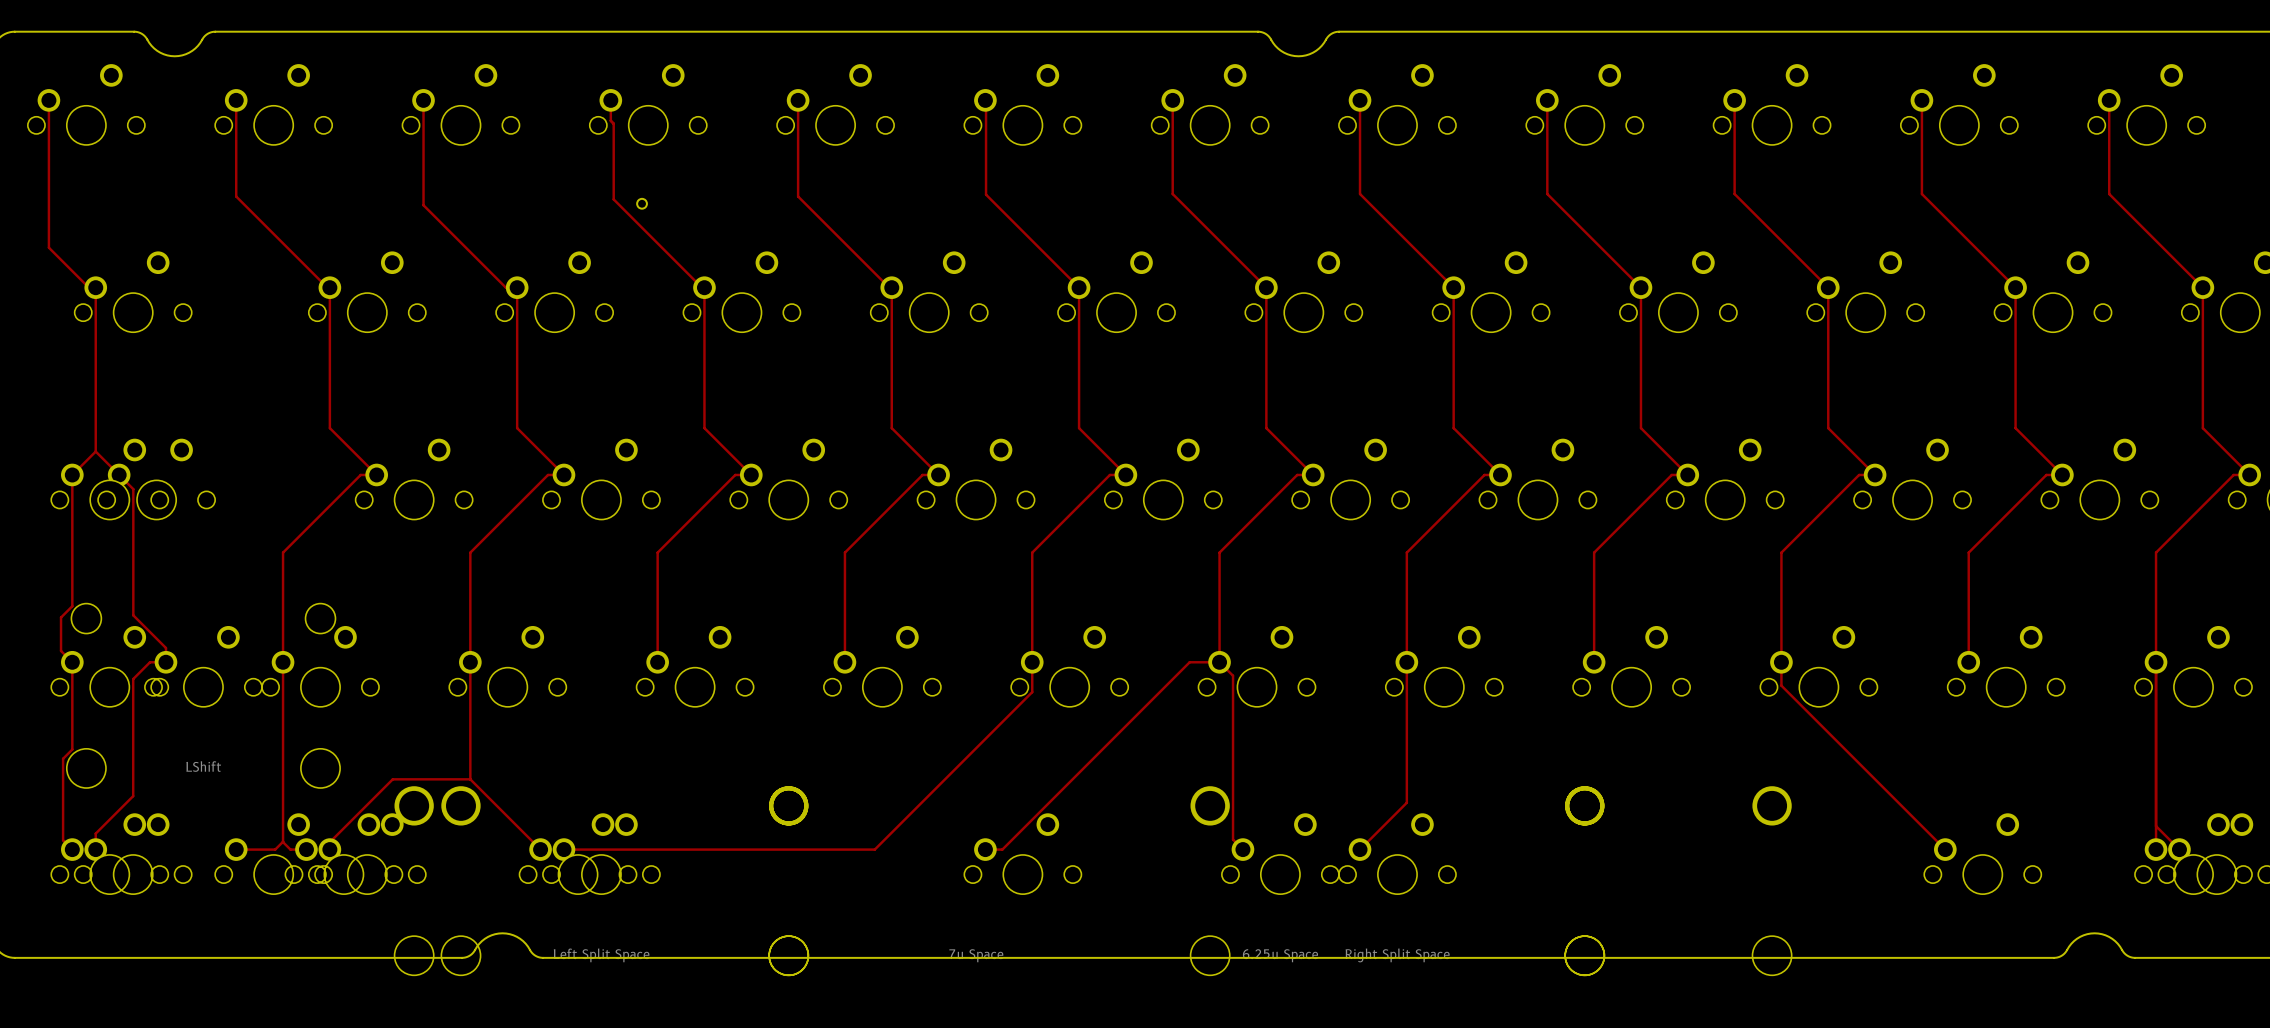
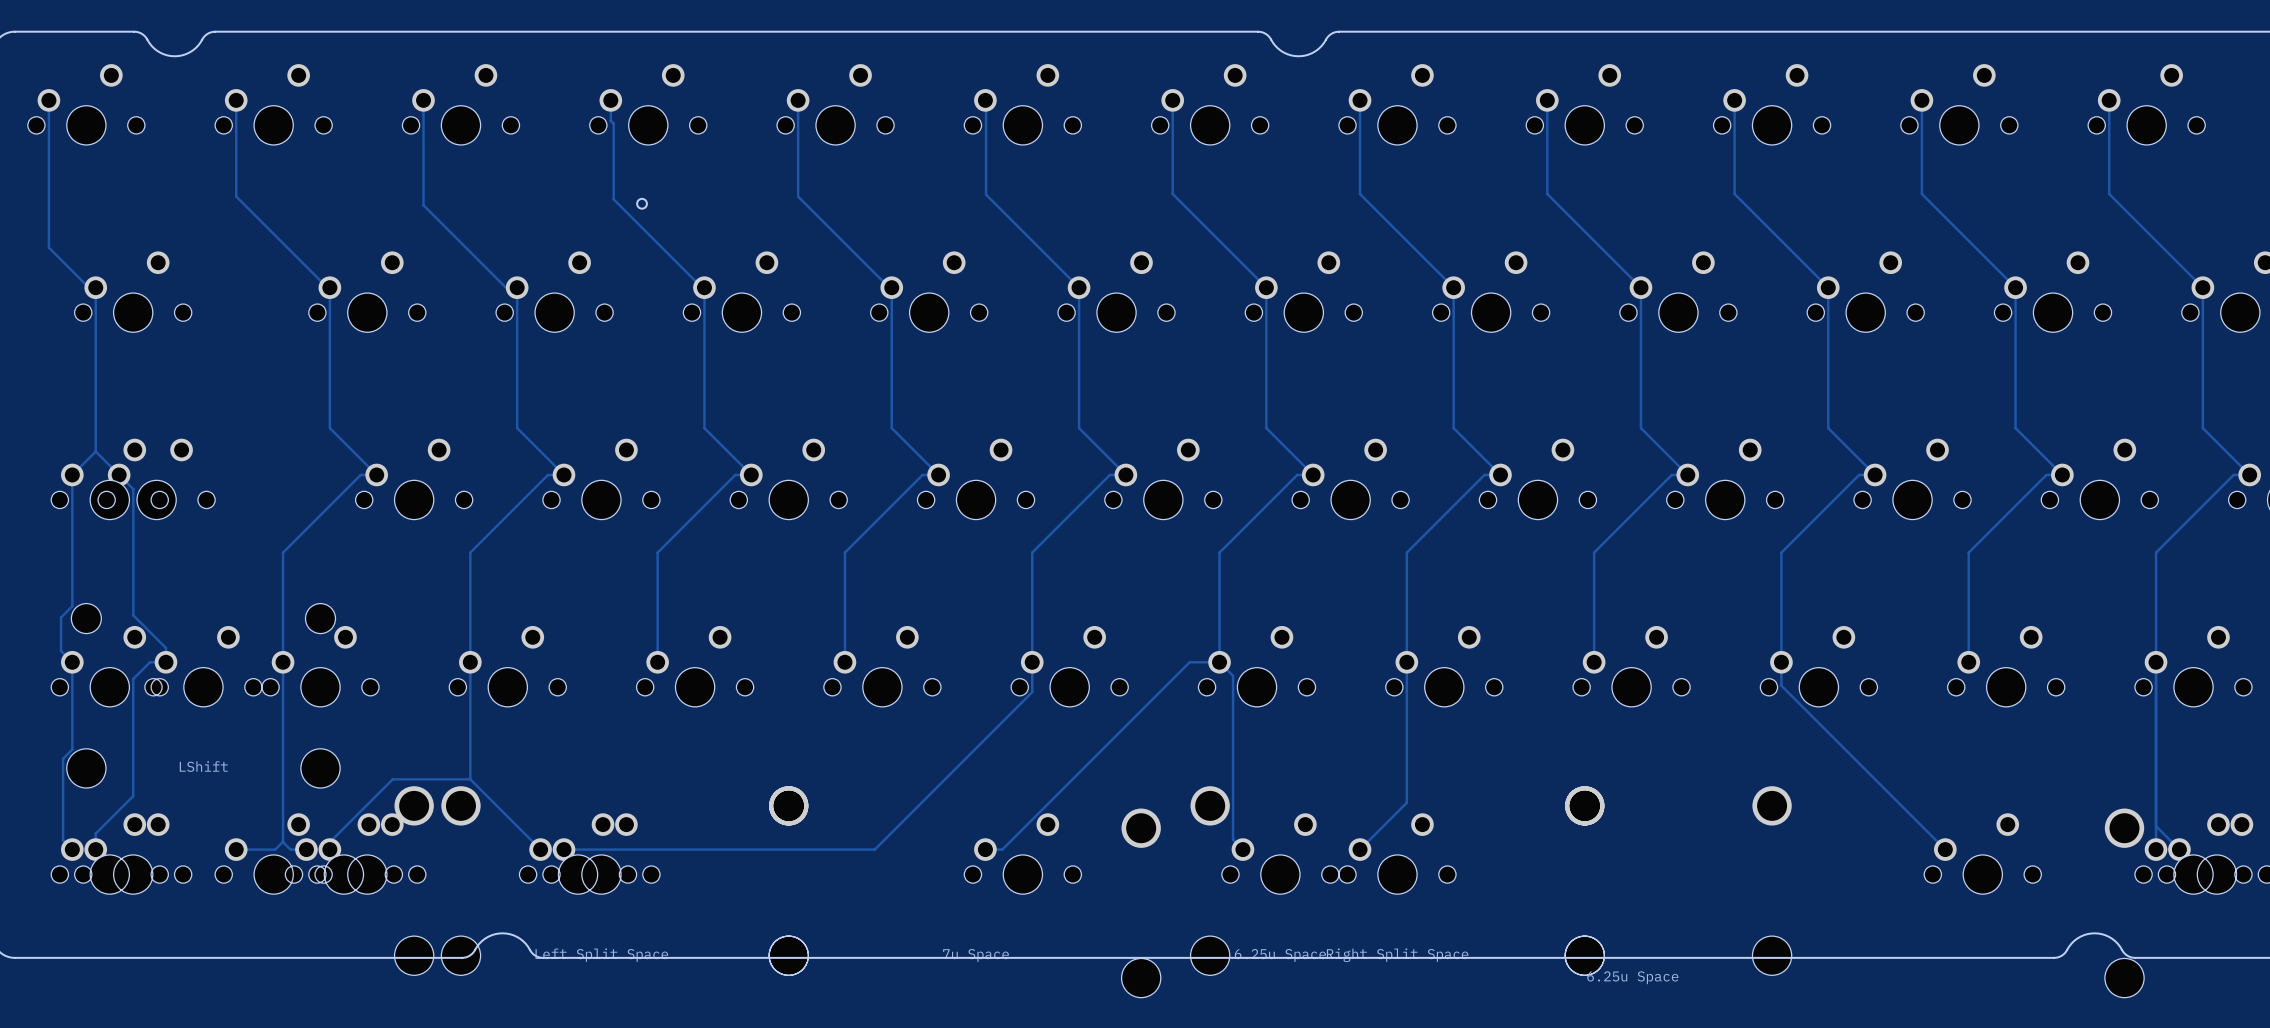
part: none -> 6.25u Space (1632, 903)

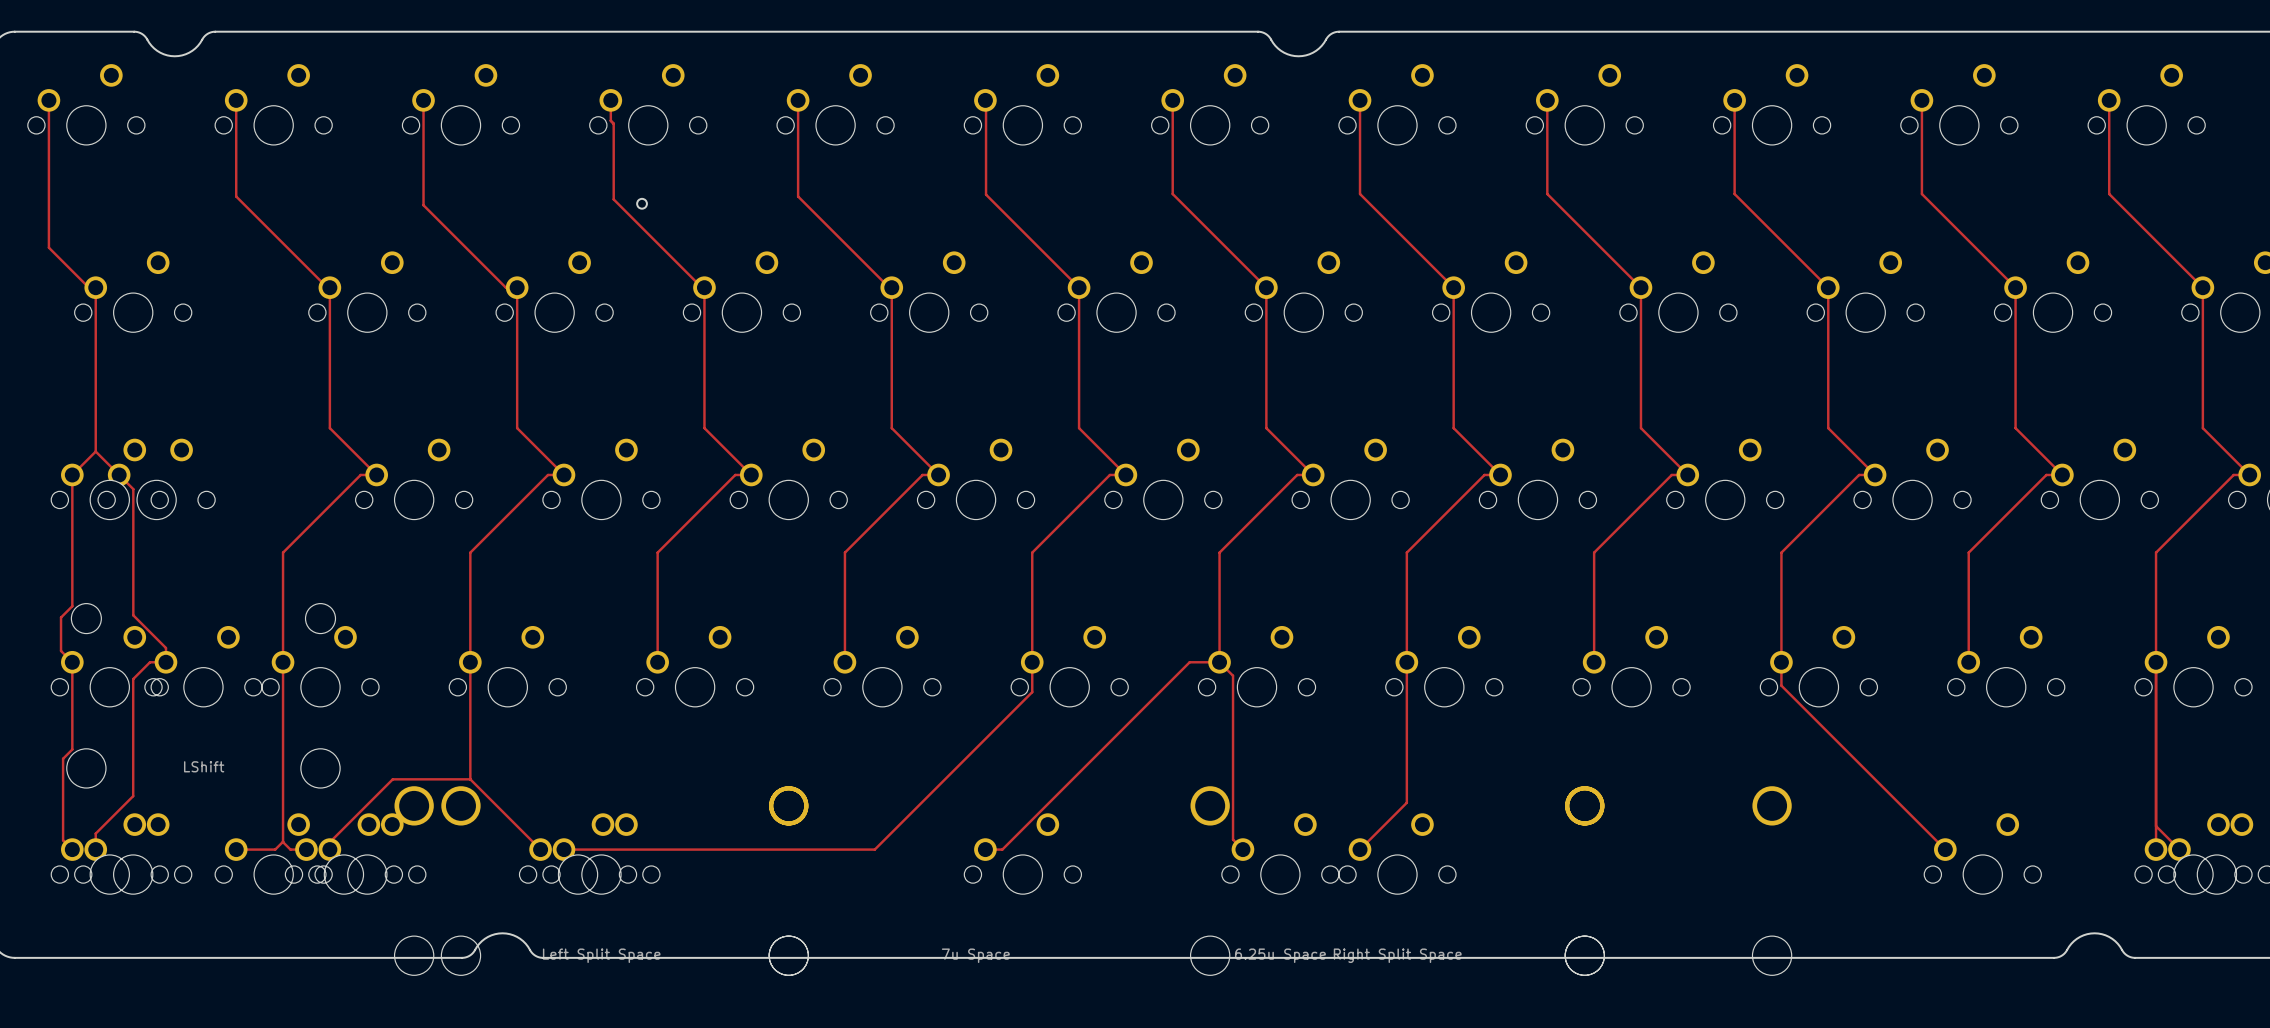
part: 6.25u Space (1632, 903) -> none

